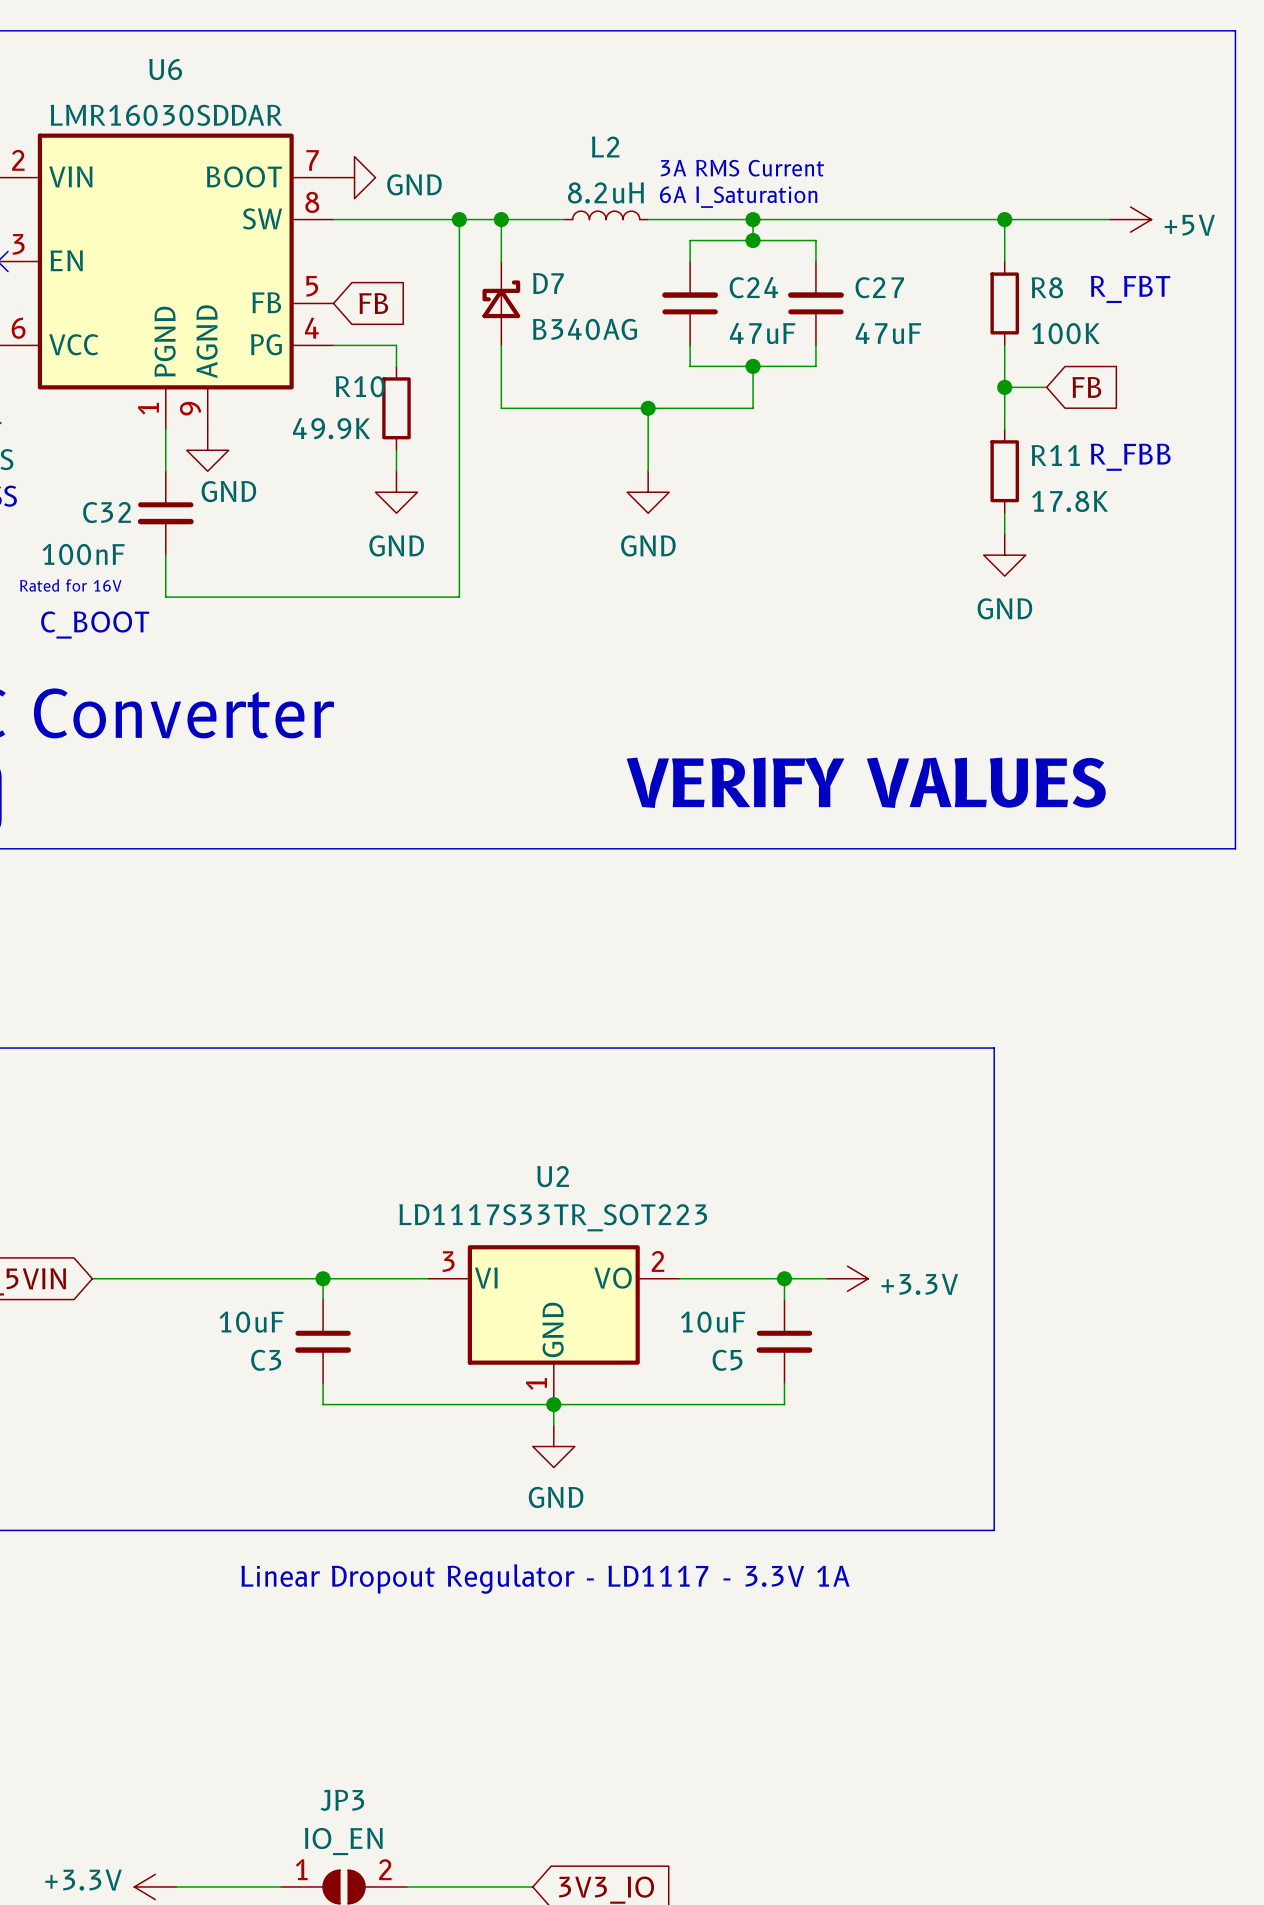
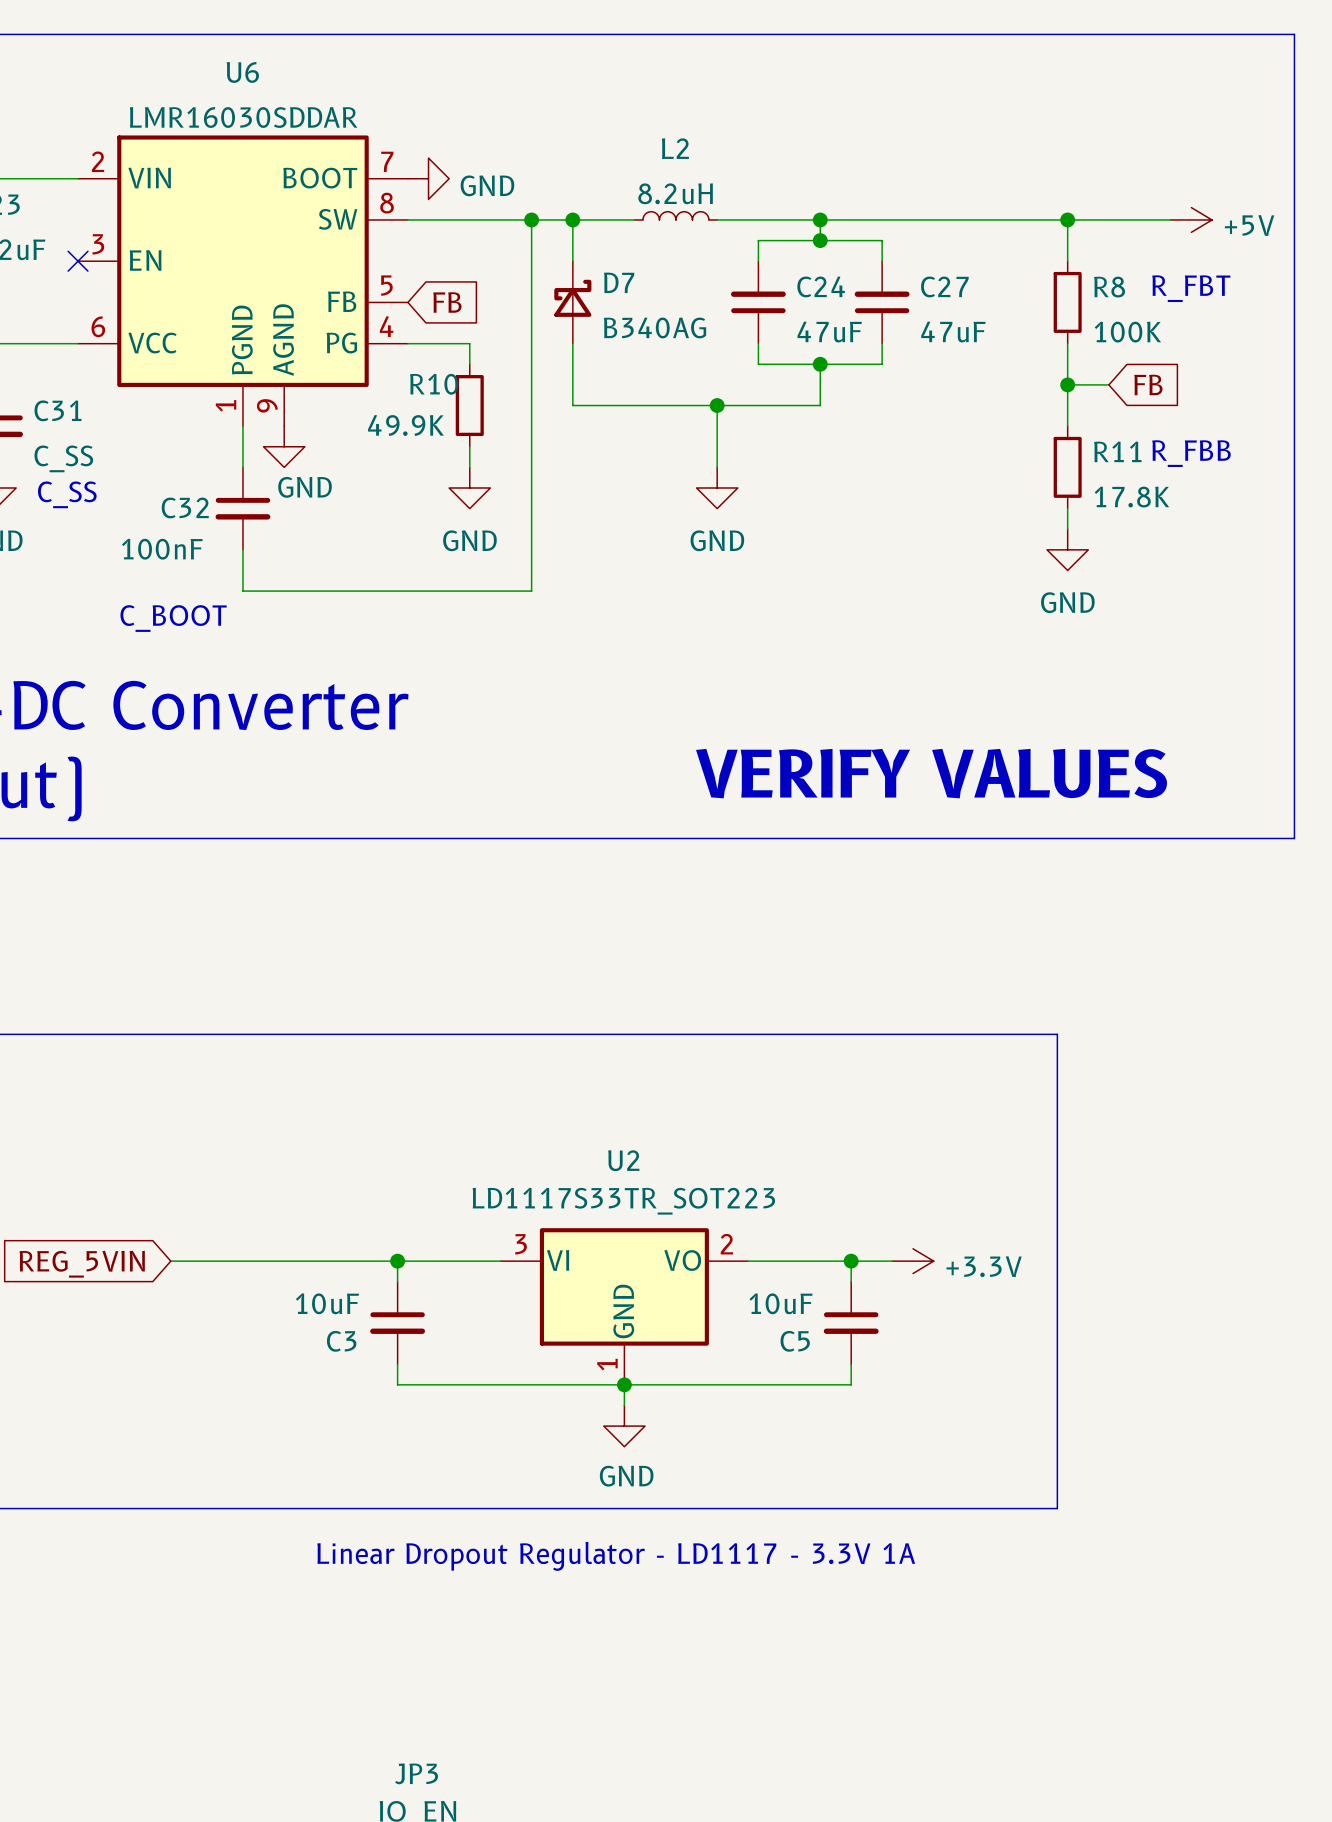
text: 3A RMS Current (742, 168) -> none
text: 6A I_Saturation (738, 197) -> none
text: Rated for 16V (70, 585) -> none

